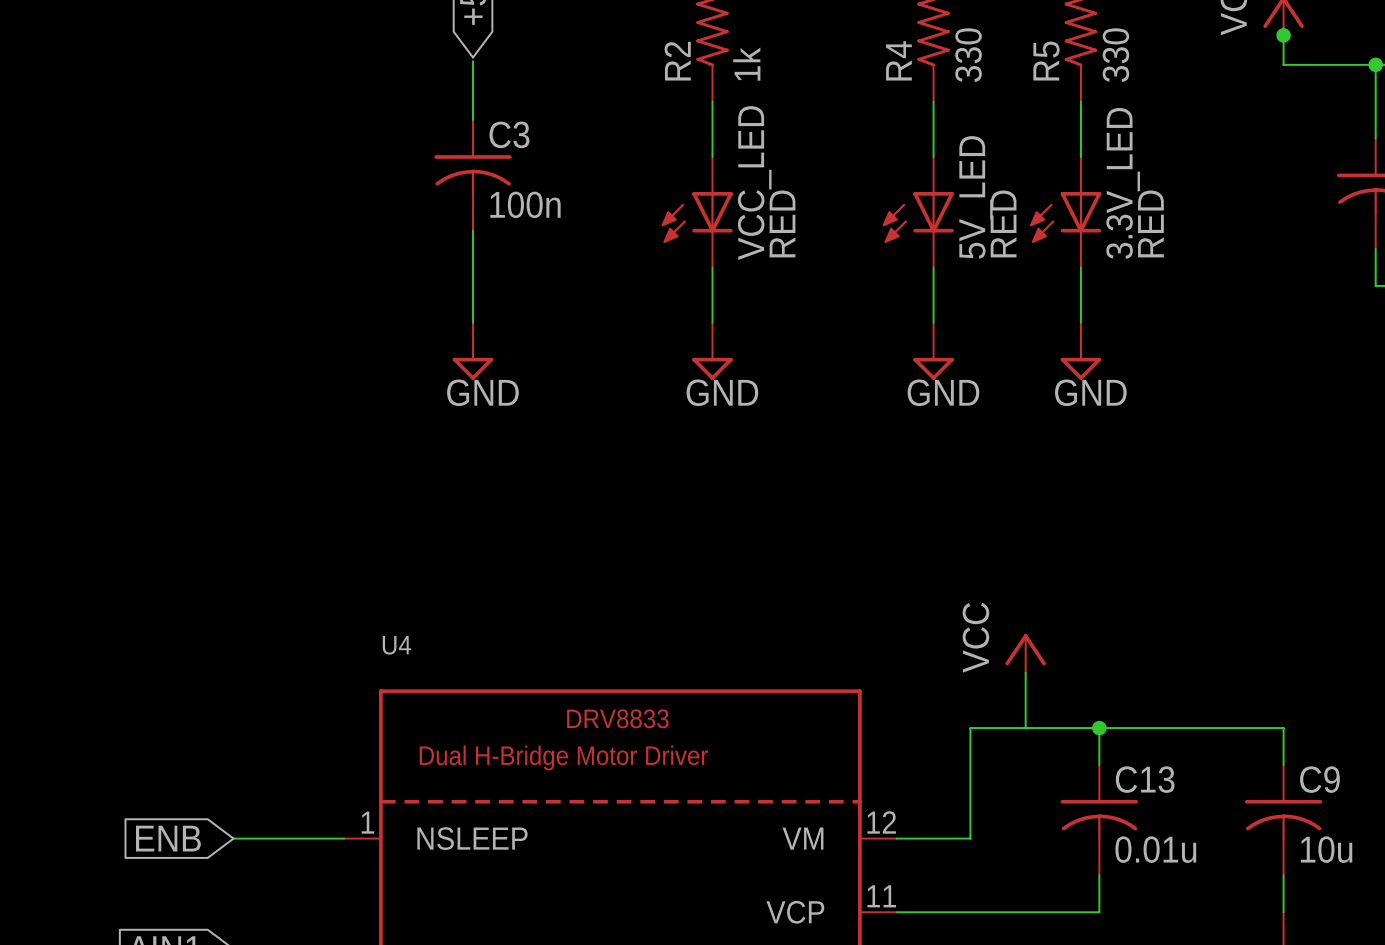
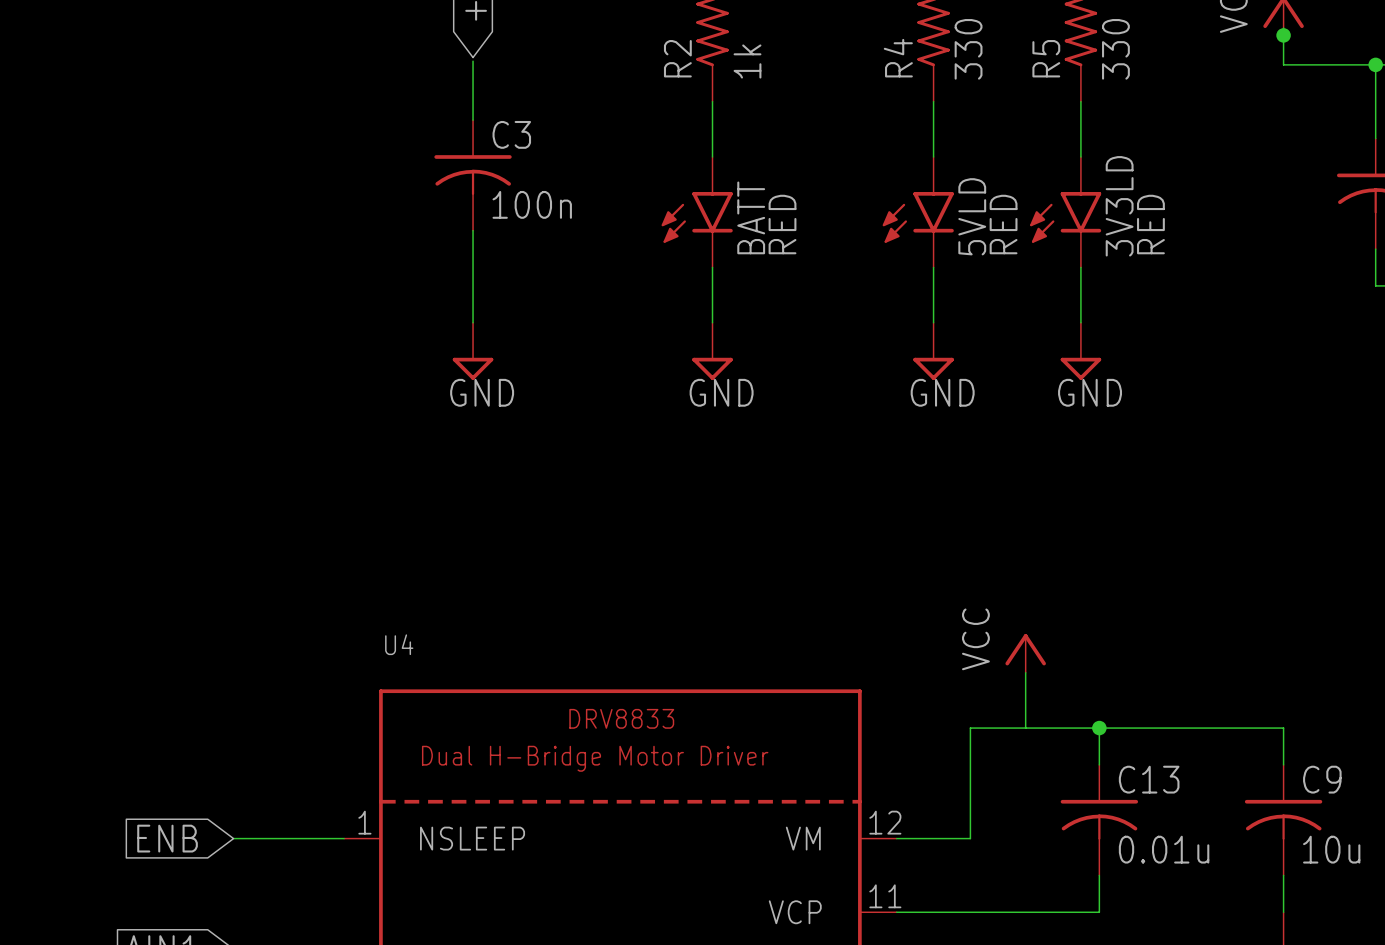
VCC_LED: RED (697, 212) -> none
BATT: none -> RED (697, 212)
5V_LED: RED (918, 212) -> none
5VLD: none -> RED (918, 212)
3.3V_LED: RED (1065, 212) -> none
3V3LD: none -> RED (1065, 212)

